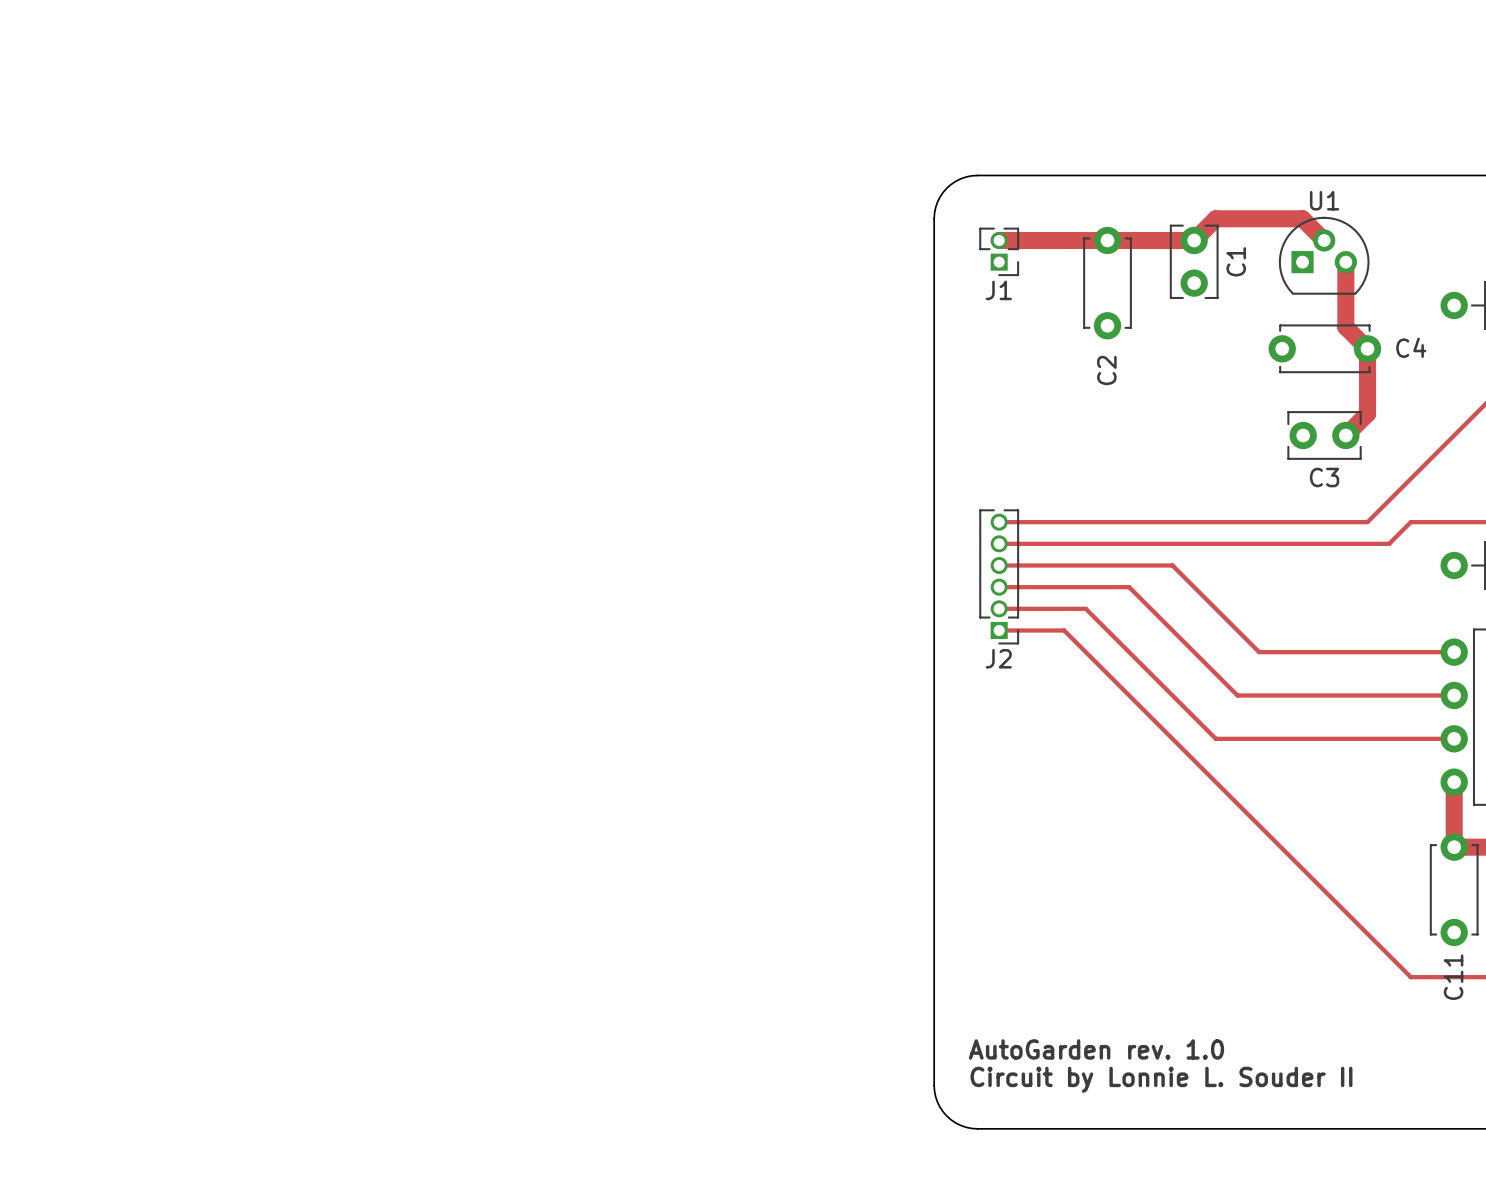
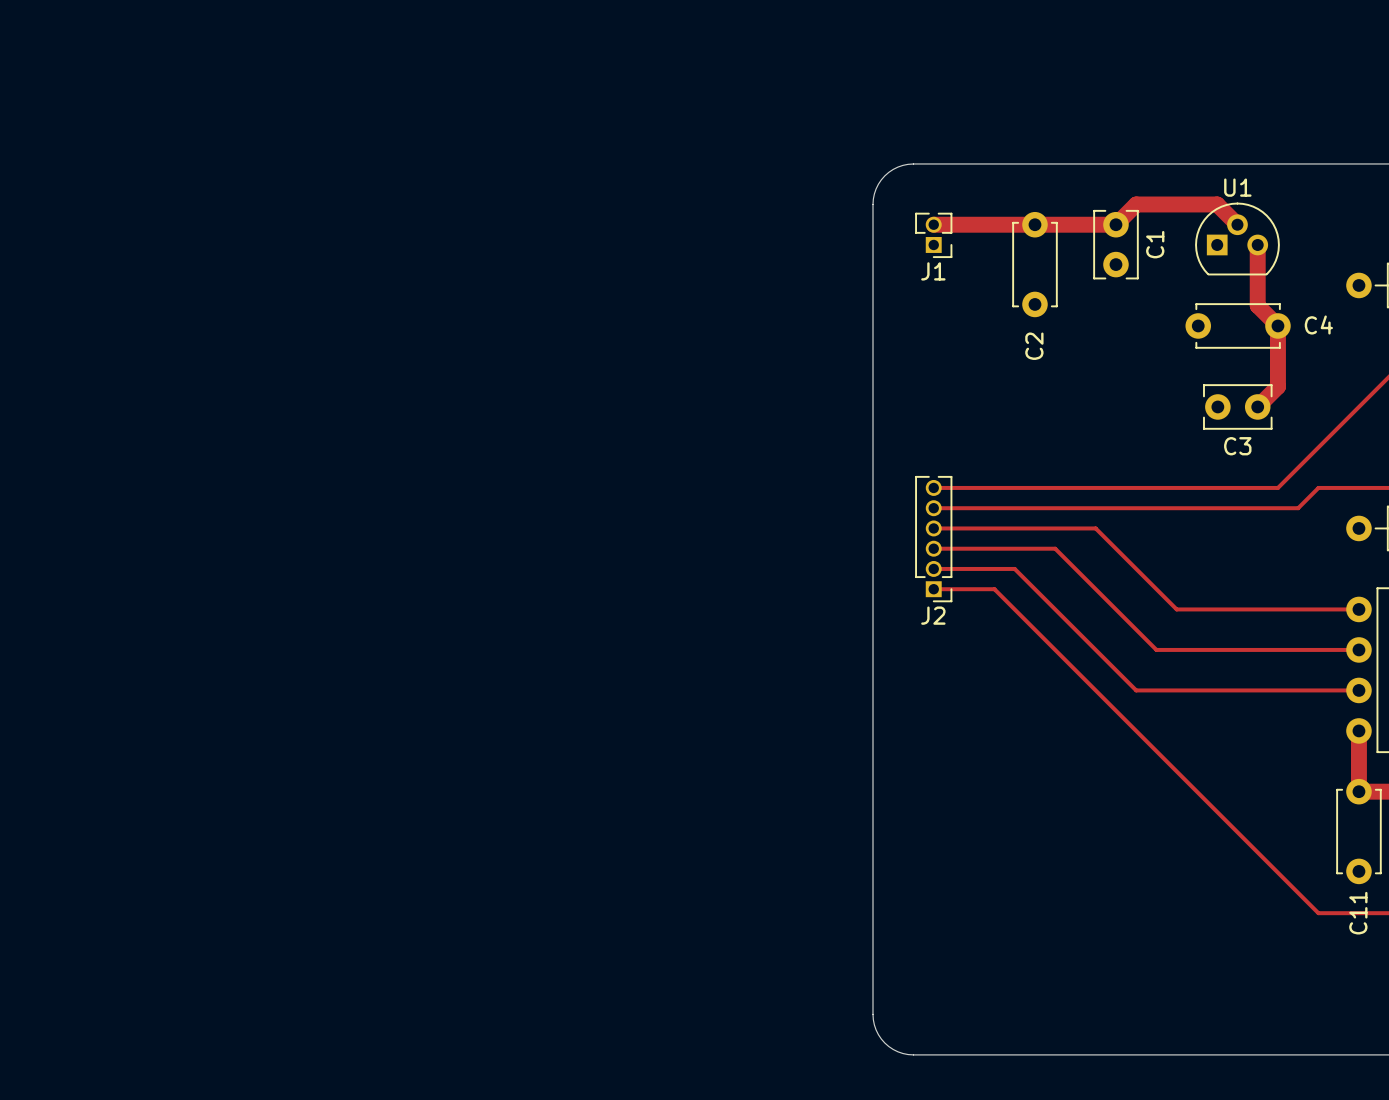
text: AutoGarden rev. 1.0 (1096, 1049) -> none
text: Circuit by Lonnie L. Souder II (1161, 1079) -> none

